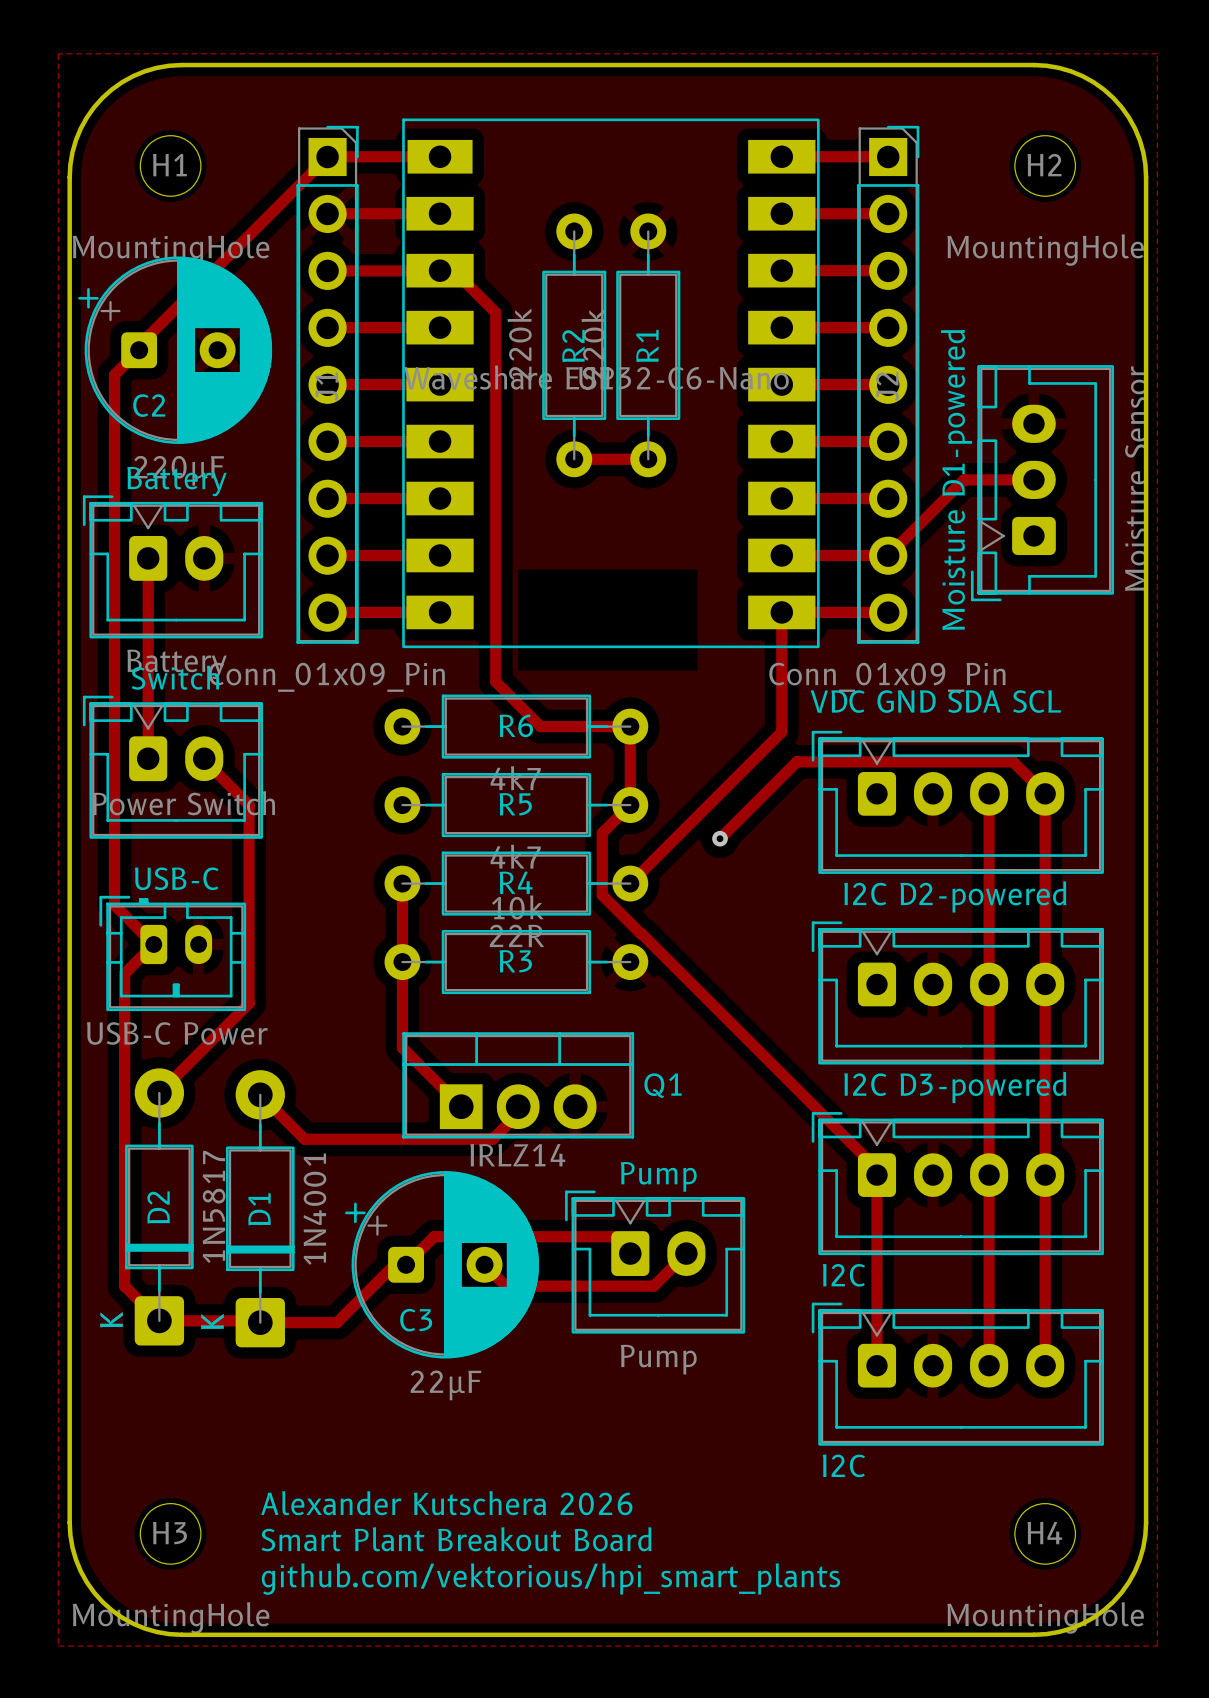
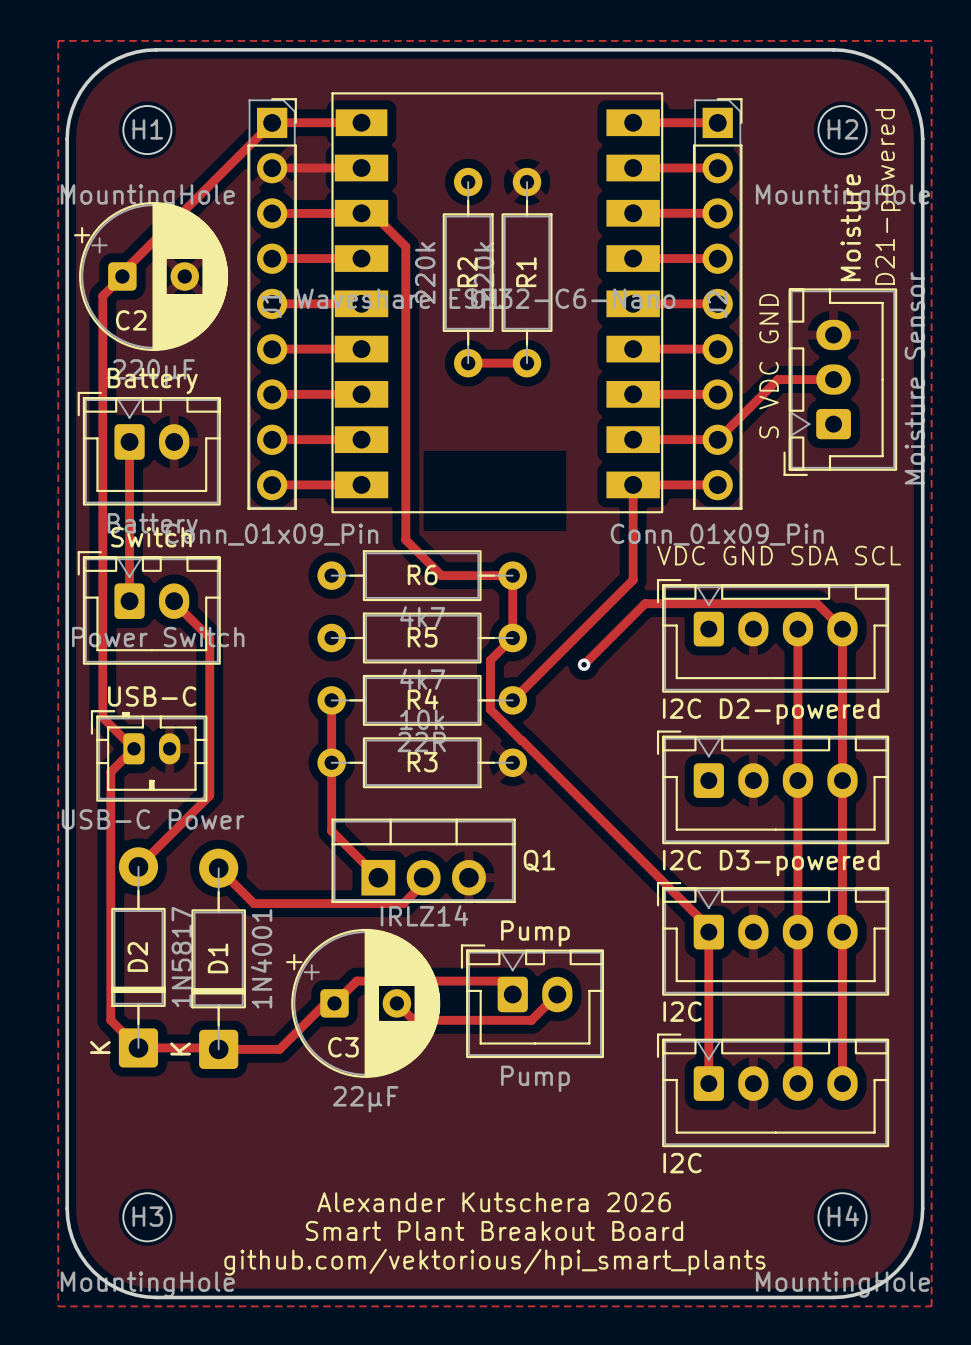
text: none -> D21-powered (888, 196)
Moisture D1-powered name: Moisture D1-powered (956, 479) -> Moisture (850, 227)
text: none -> S VDC GND (769, 366)
text position: Alexander Kutschera 2026 (446, 1503) -> Alexander Kutschera 2026 (494, 1202)
text position: Smart Plant Breakout Board (456, 1539) -> Smart Plant Breakout Board (494, 1230)
text position: github.com/vektorious/hpi_smart_plants (550, 1579) -> github.com/vektorious/hpi_smart_plants (494, 1262)

